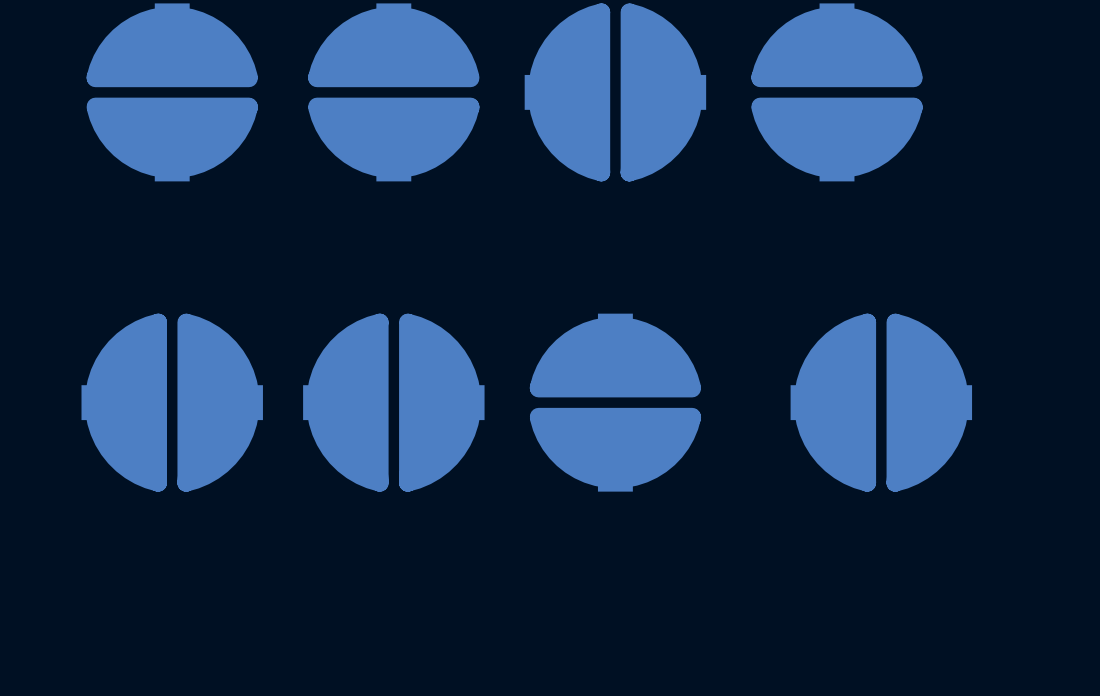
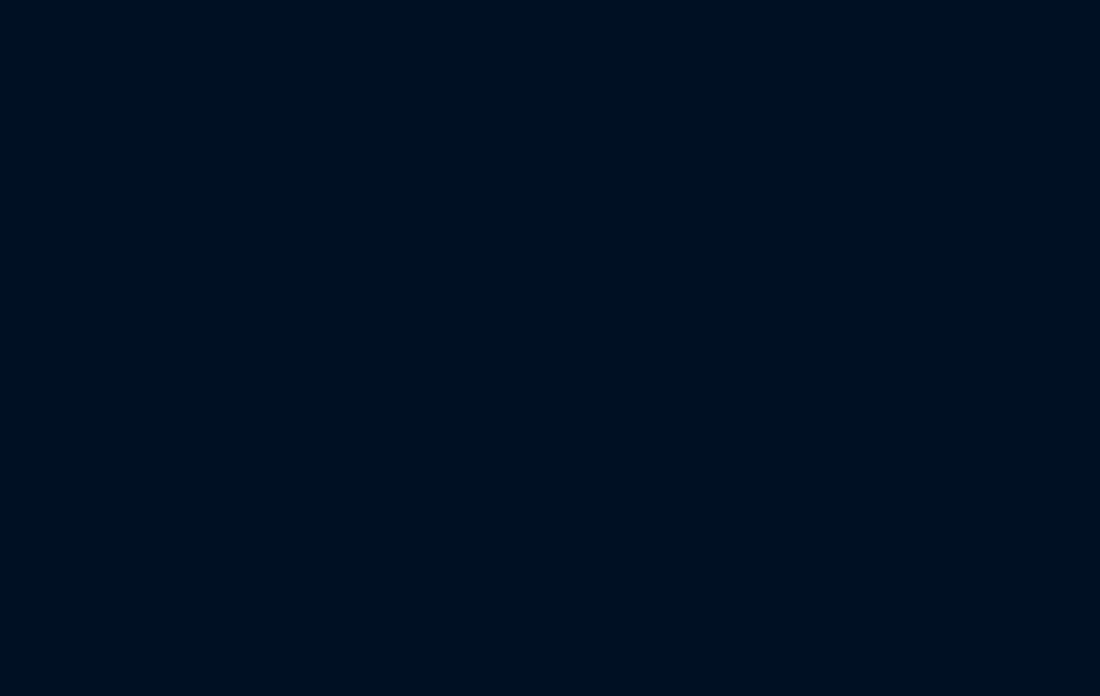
part: (172, 92) -> none
part: (393, 92) -> none
part: (615, 92) -> none
part: (837, 92) -> none
part: (172, 402) -> none
part: (393, 402) -> none
part: (615, 402) -> none
part: (881, 402) -> none

